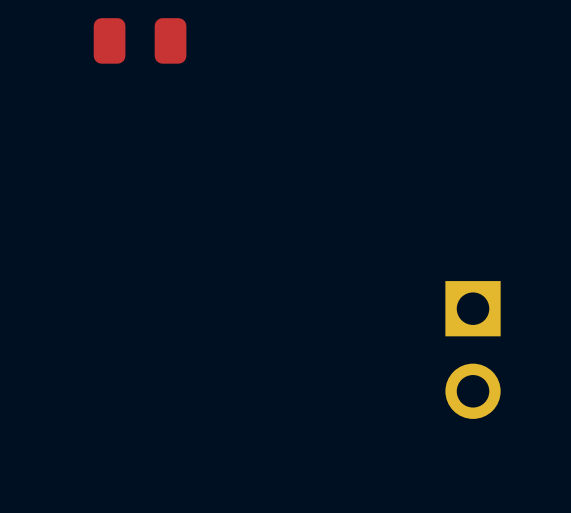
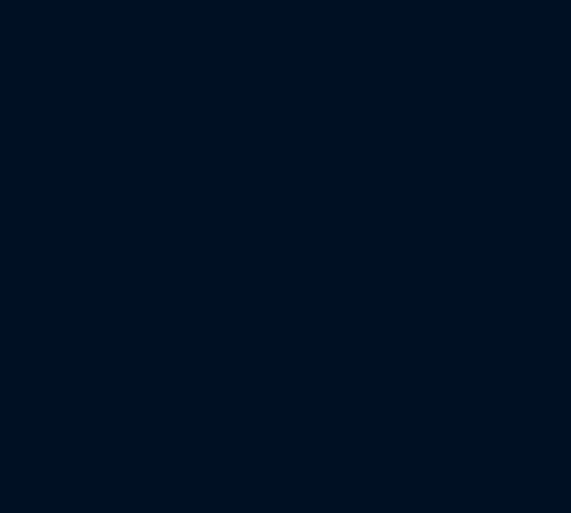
part: (140, 40) -> none
part: (473, 349) -> none

